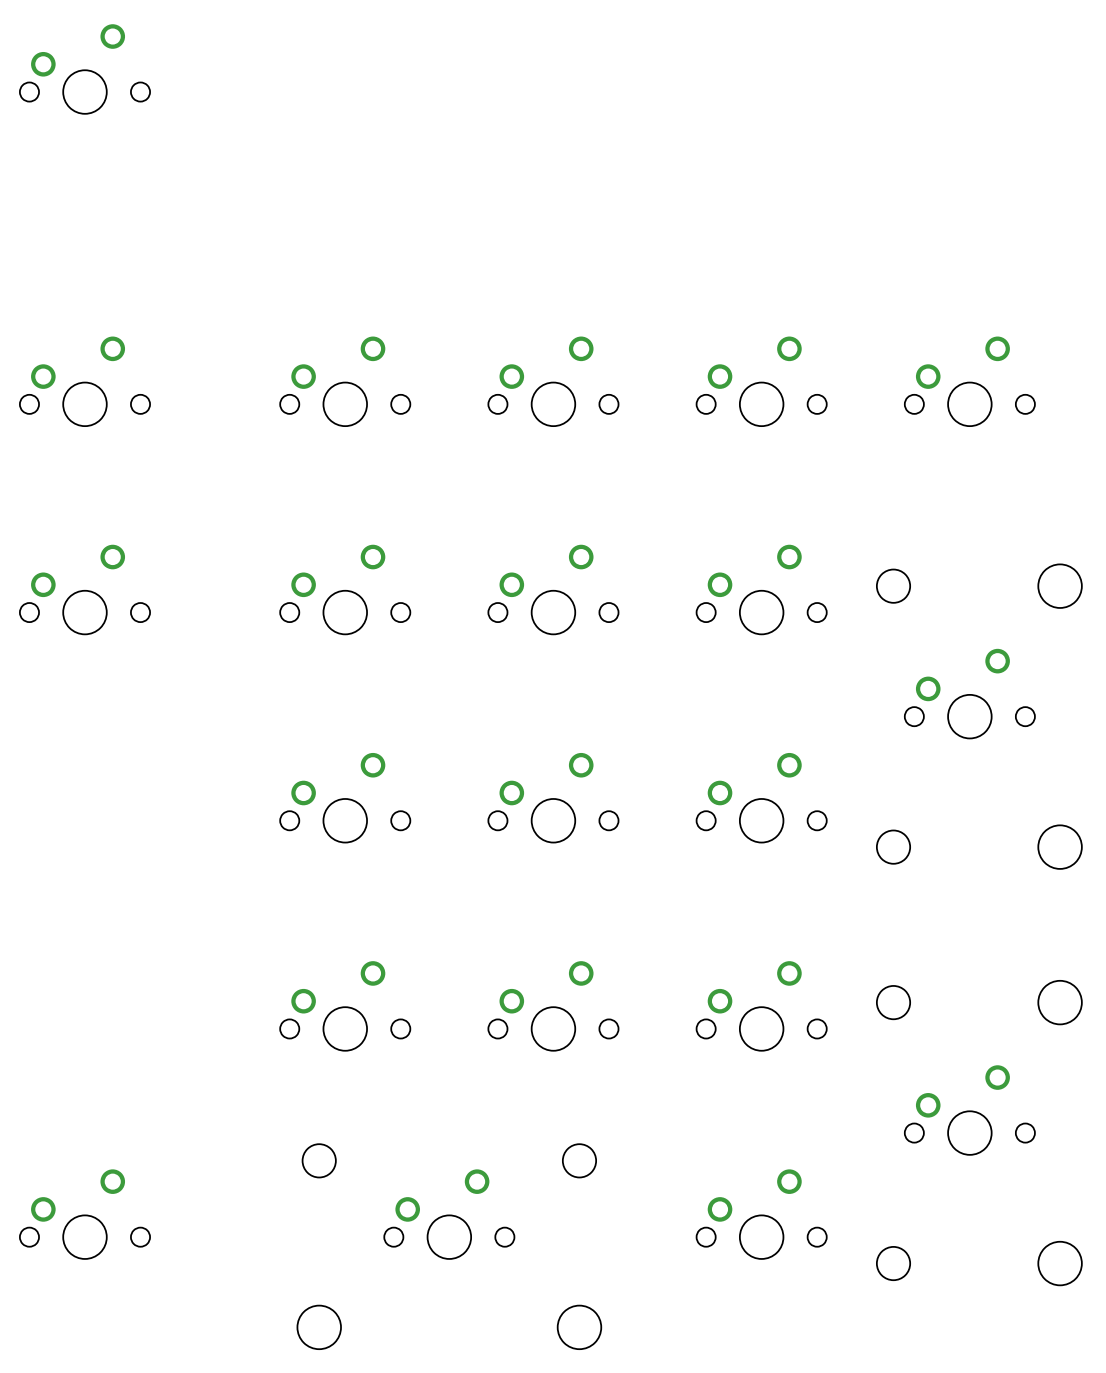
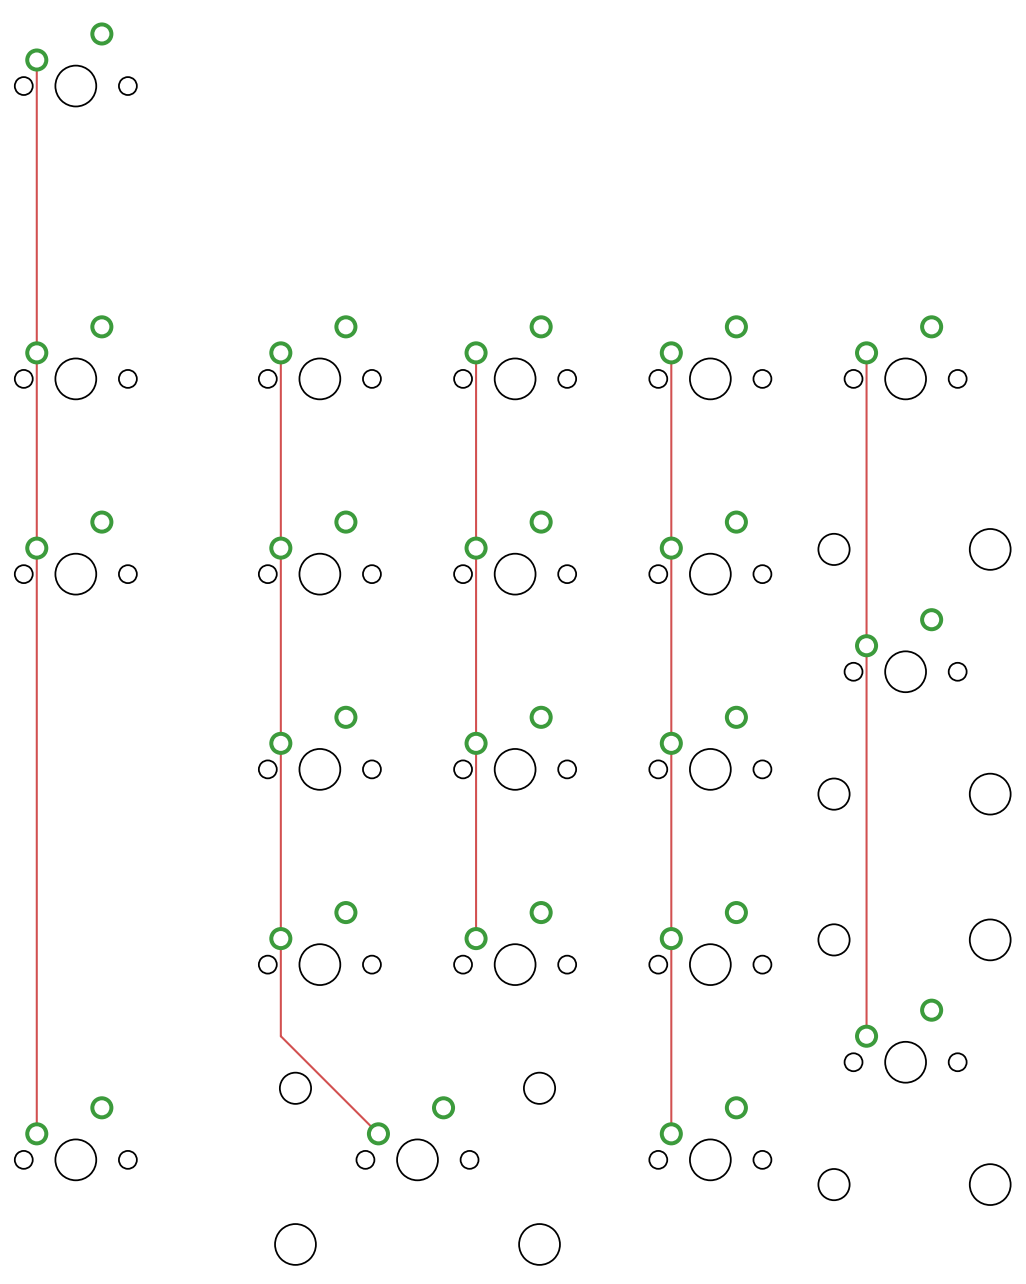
track: none -> (36, 60) (36, 1133)
track: none -> (280, 352) (280, 1036) (378, 1133)
track: none -> (476, 352) (476, 938)
track: none -> (671, 352) (671, 1133)
track: none -> (866, 352) (866, 1036)

